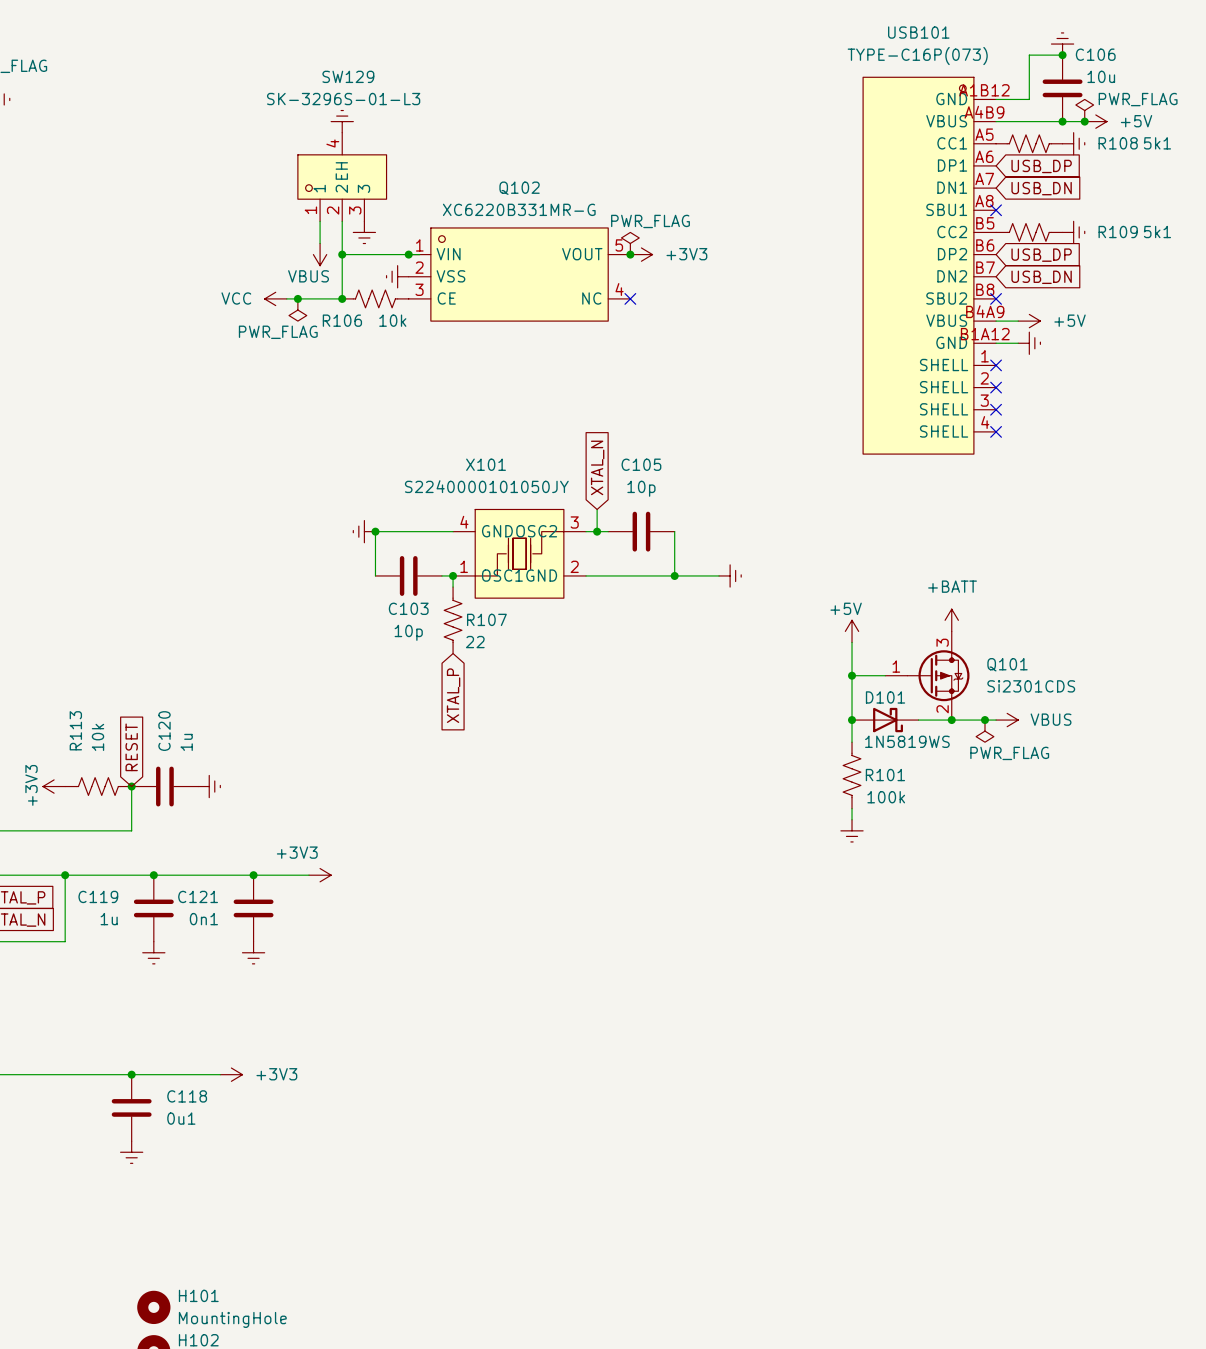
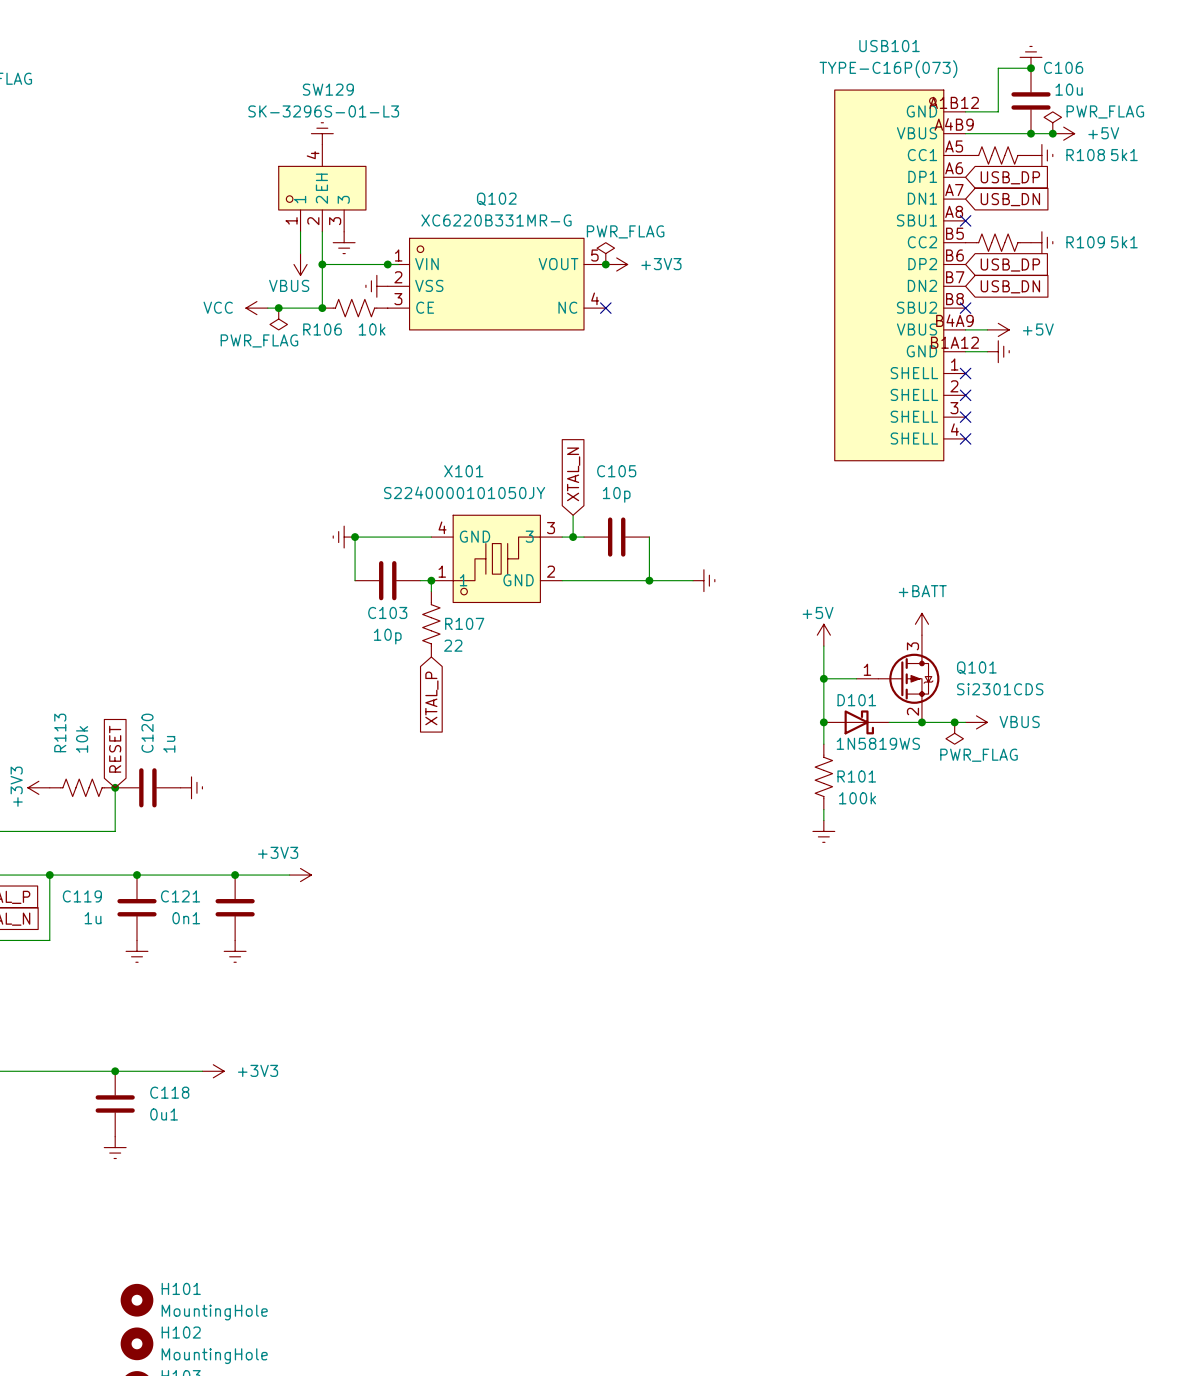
X101 symbol: [453, 509, 587, 599] -> [431, 515, 563, 603]

